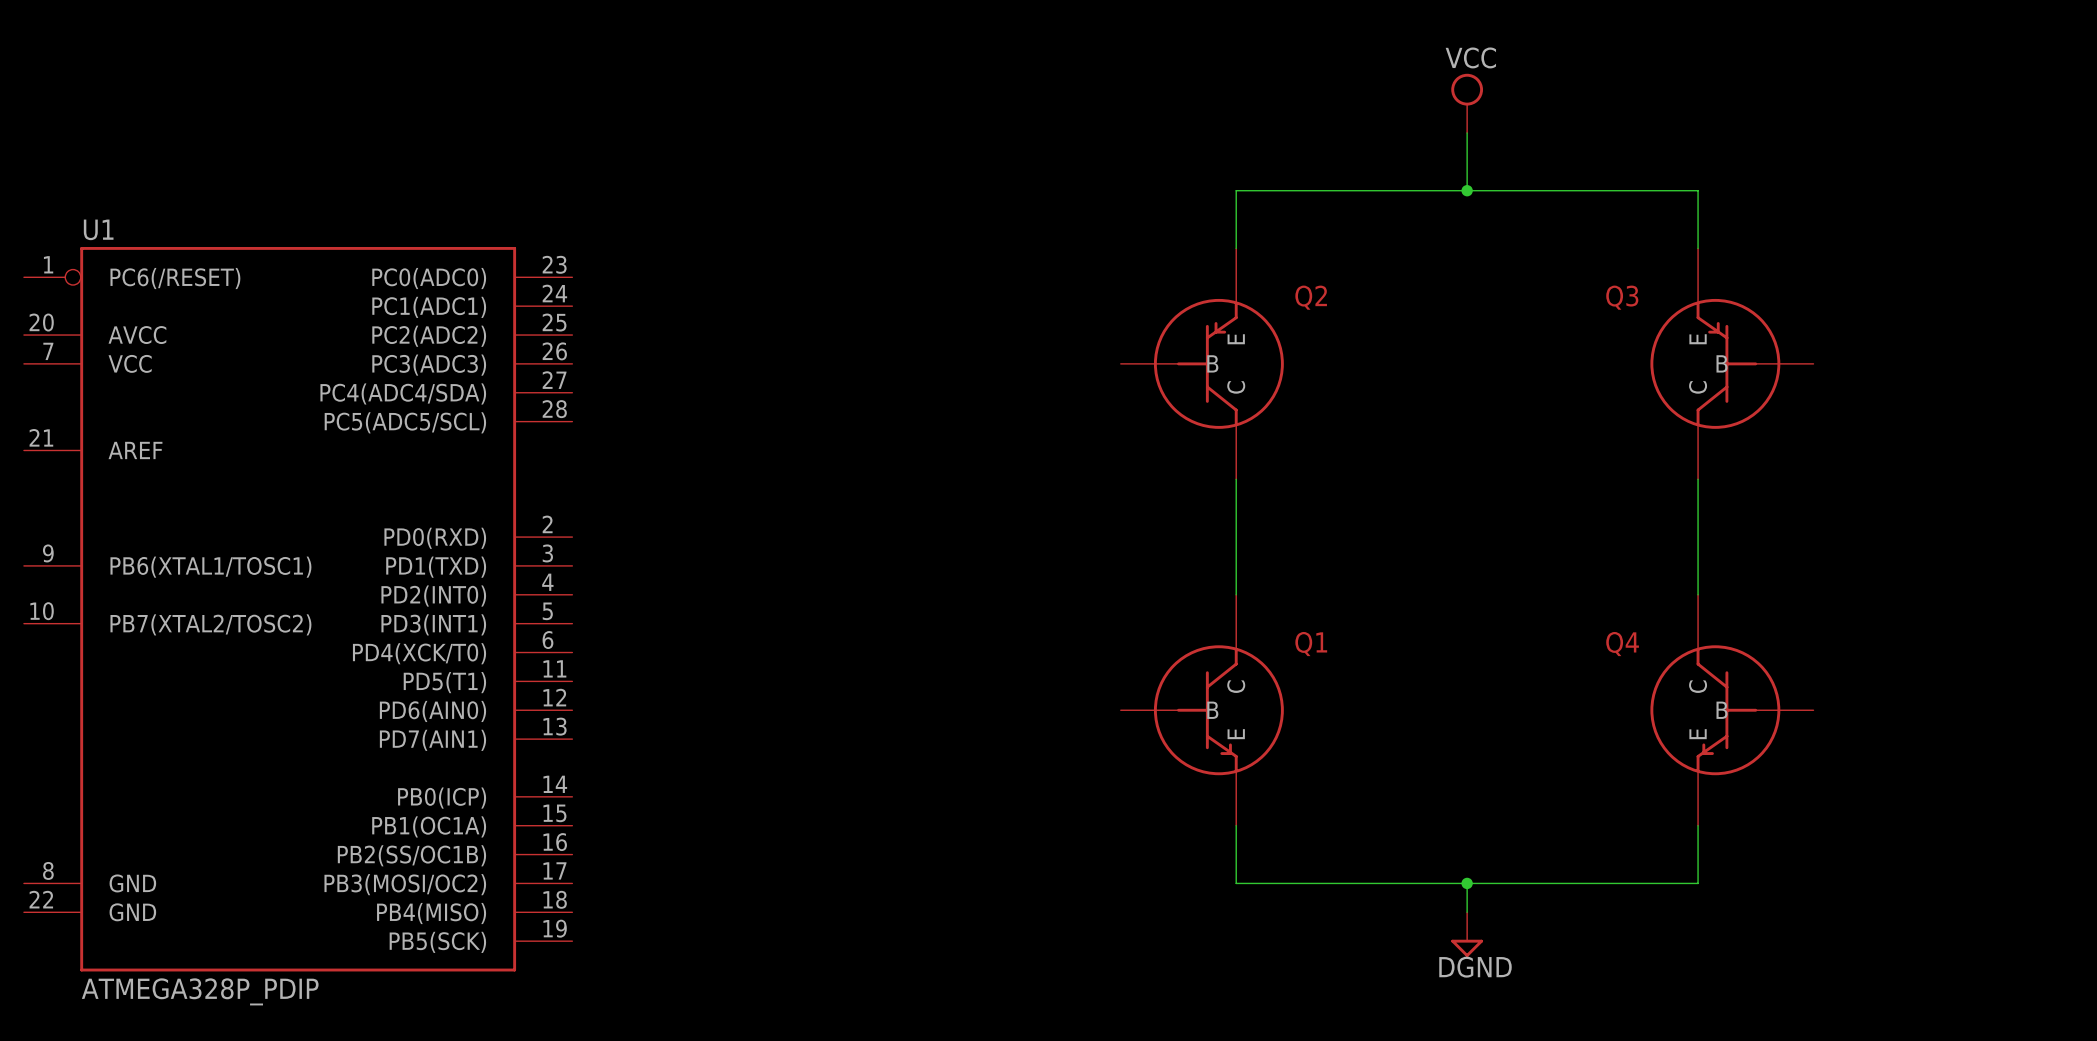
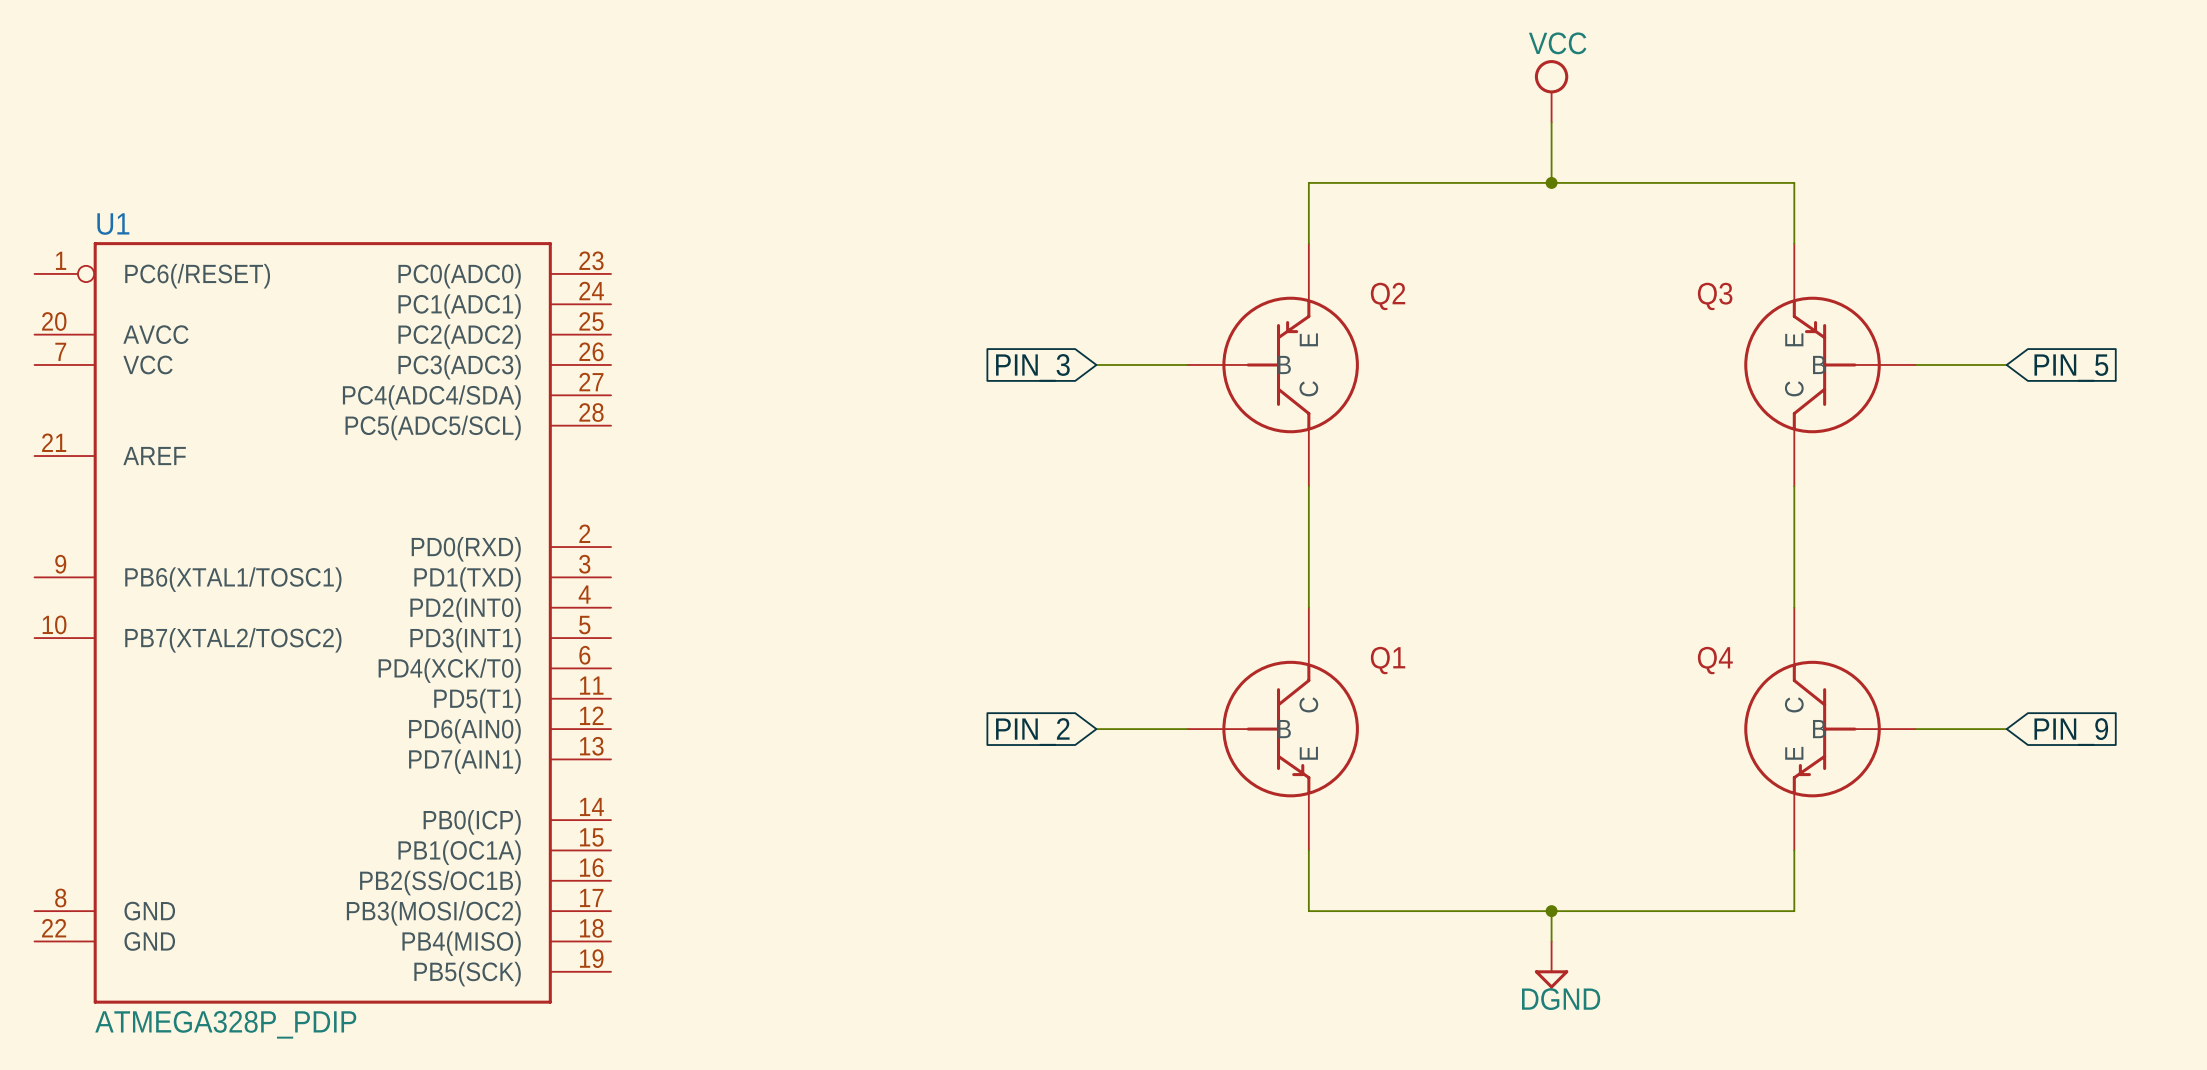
wire: none -> (1096, 364) (1187, 364)
wire: none -> (1915, 364) (2006, 364)
global label: none -> PIN_3 (1032, 367)
global label: none -> PIN_5 (2071, 368)
wire: none -> (1096, 729) (1187, 729)
wire: none -> (1915, 729) (2006, 729)
global label: none -> PIN_2 (1032, 731)
global label: none -> PIN_9 (2071, 731)

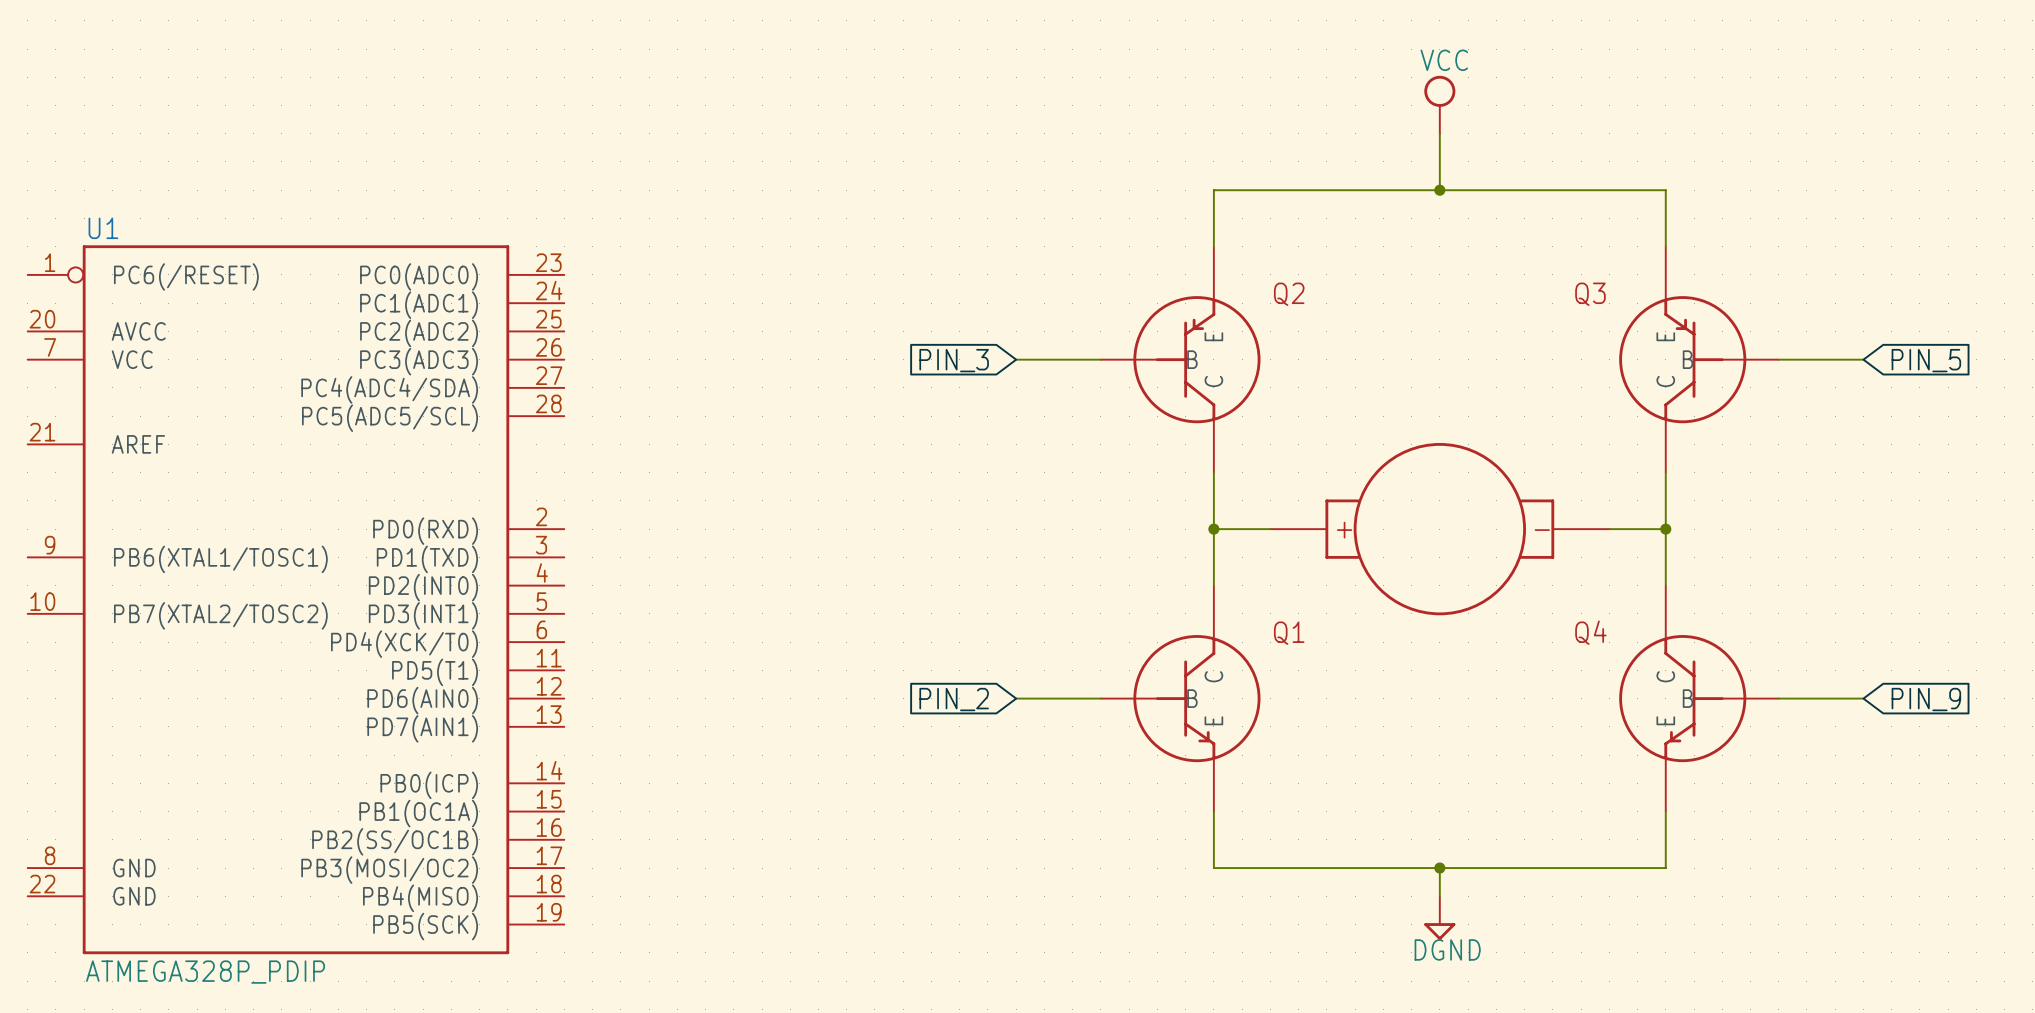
wire: none -> (1213, 529) (1270, 529)
junction: none -> (1213, 529)
part: none -> (1439, 529)
wire: none -> (1609, 529) (1665, 529)
junction: none -> (1665, 529)

